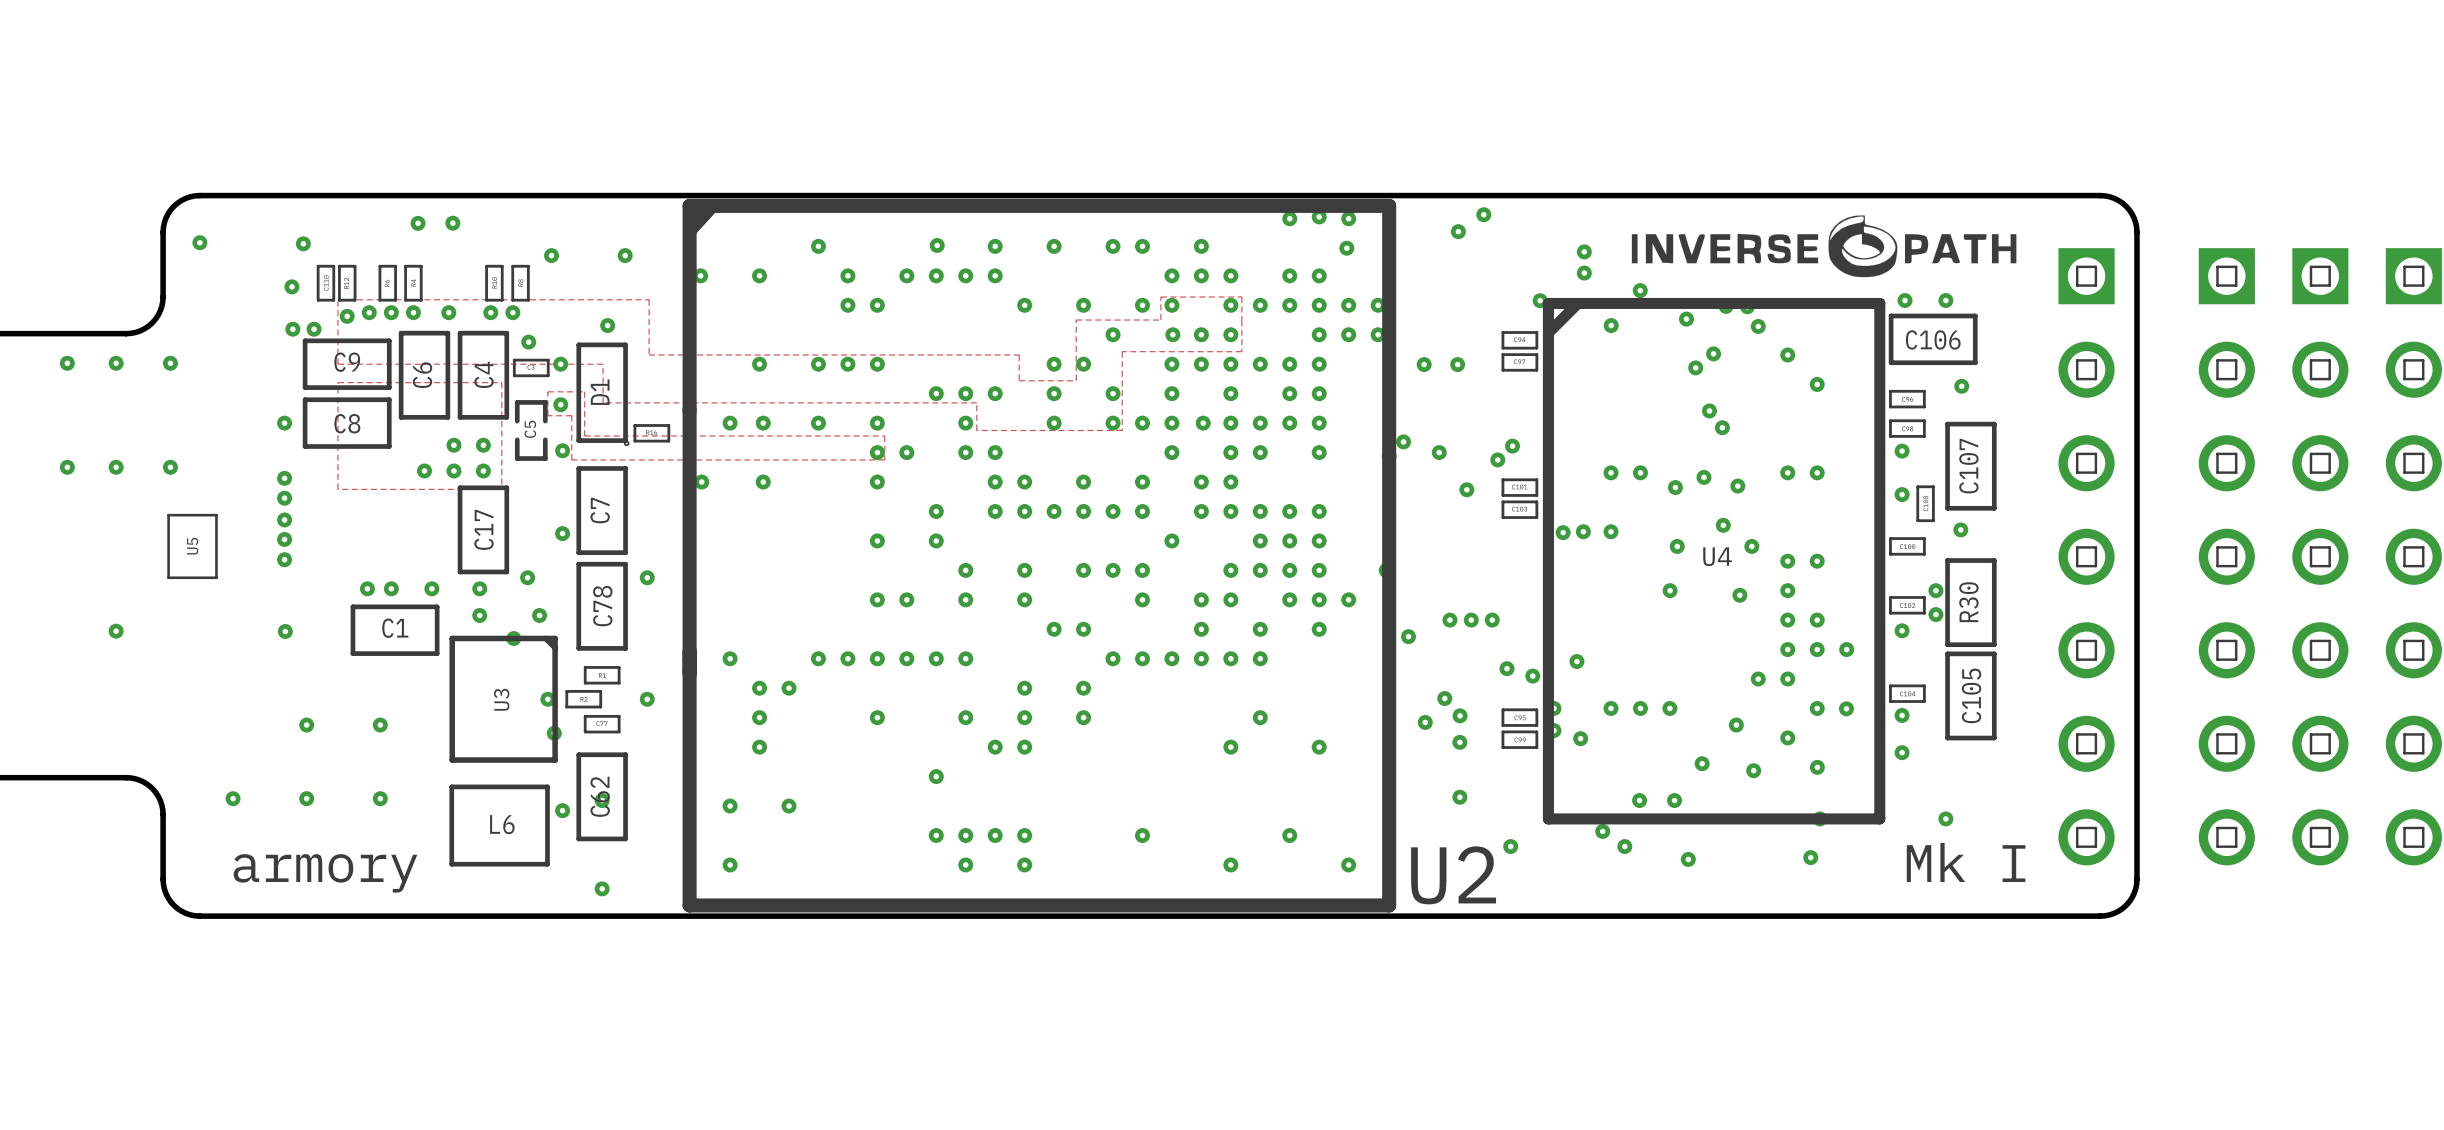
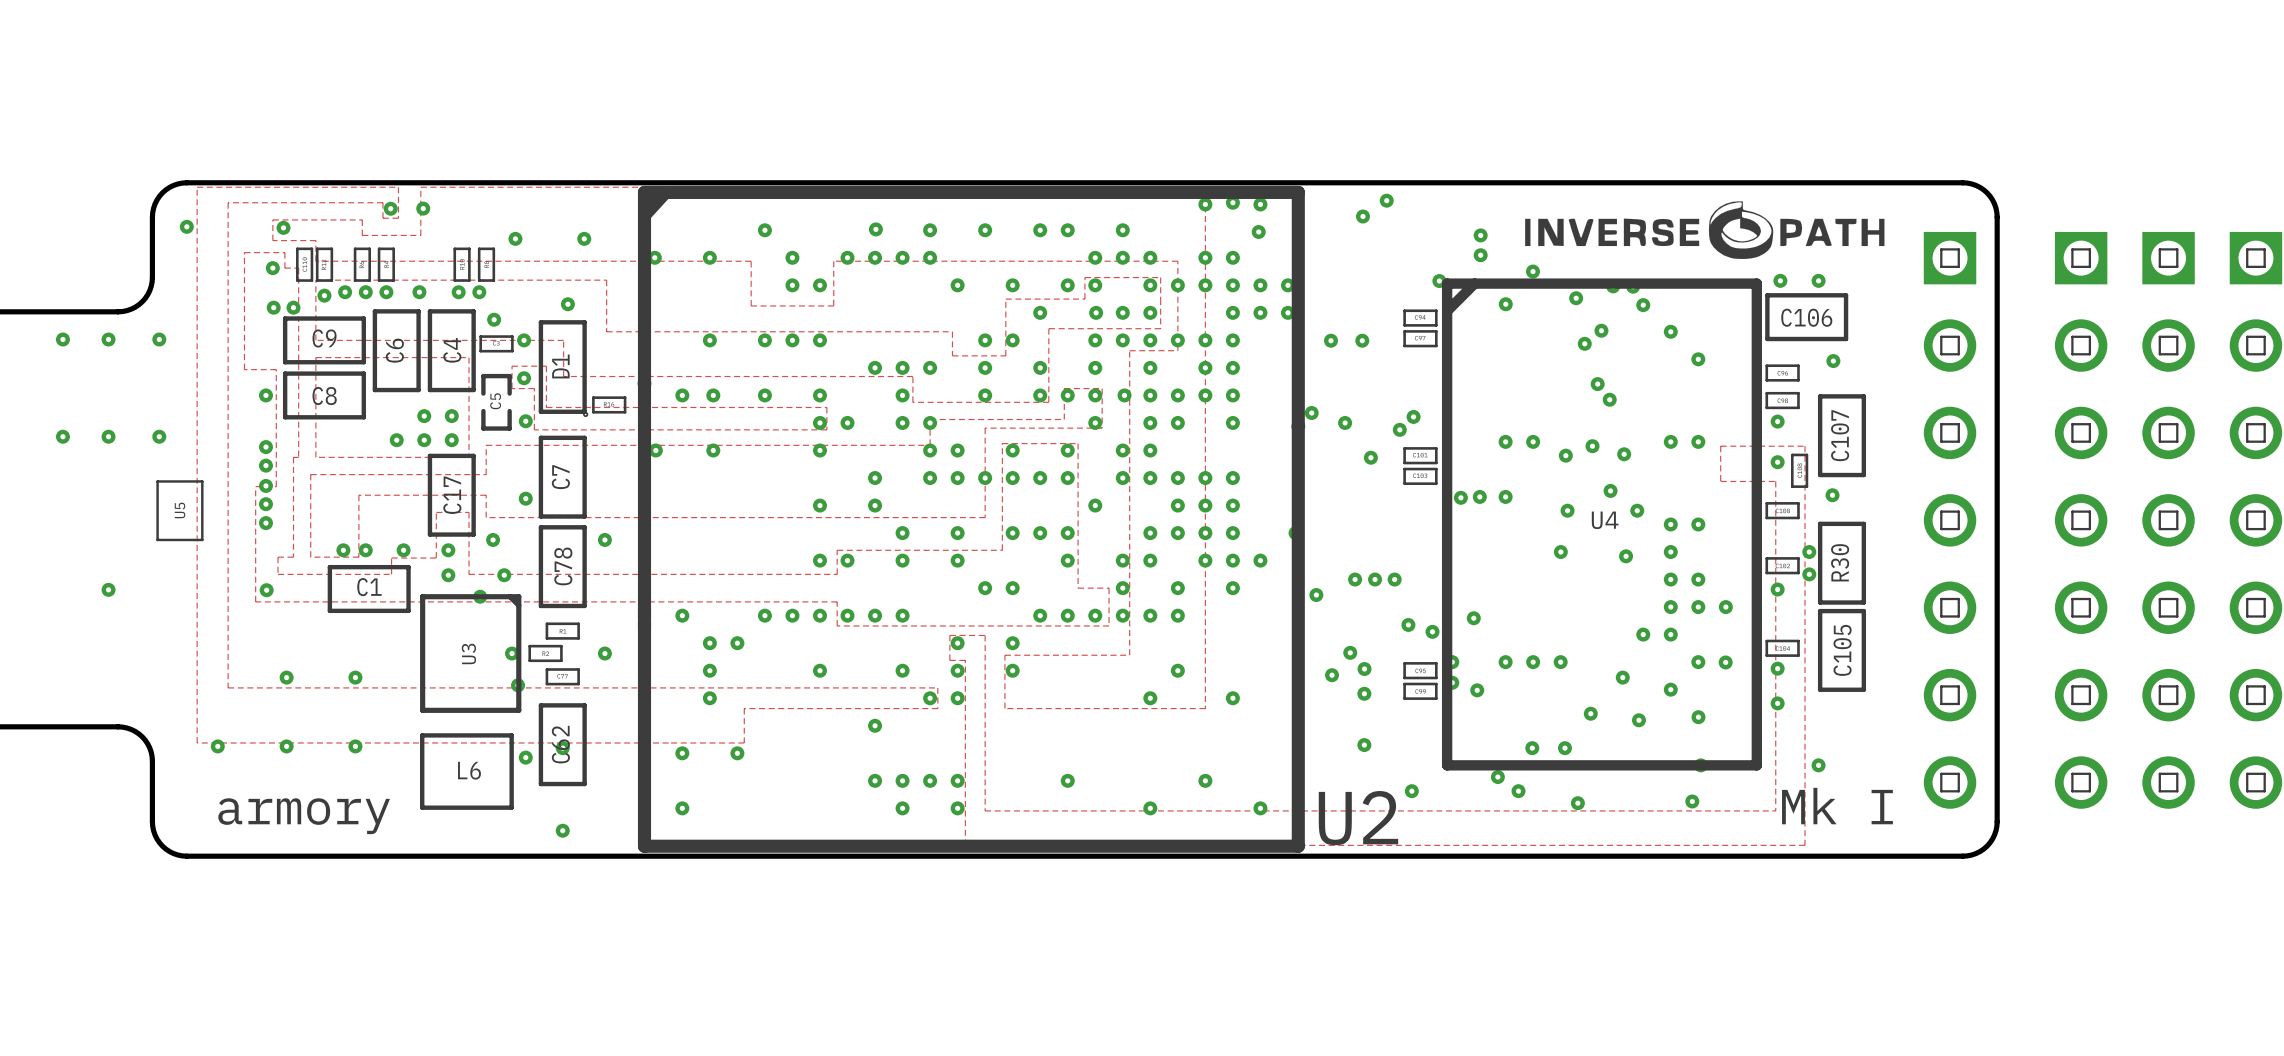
zone outline: none -> (197, 187) (197, 742) (744, 742) (744, 708) (937, 708) (937, 687) (228, 687) (228, 202) (382, 202) (382, 218) (398, 218) (398, 187) (197, 187)
zone outline: none -> (420, 187) (1205, 187) (1205, 708) (1004, 708) (1004, 655) (1129, 655) (1129, 350) (1177, 350) (1177, 261) (833, 261) (833, 305) (751, 305) (751, 261) (315, 261) (315, 240) (272, 240) (272, 219) (362, 219) (362, 235) (420, 235) (420, 187)
zone outline: none -> (244, 252) (244, 369) (276, 369) (276, 486) (255, 486) (255, 601) (837, 601) (837, 625) (1109, 625) (1109, 588) (1078, 588) (1078, 443) (1002, 443) (1002, 550) (837, 550) (837, 574) (469, 574) (469, 512) (436, 512) (436, 558) (391, 558) (391, 574) (278, 574) (278, 557) (293, 557) (293, 457) (298, 457) (298, 268) (284, 268) (284, 252) (244, 252)
zone outline: none -> (1064, 388) (1064, 419) (930, 419) (930, 445) (486, 445) (486, 474) (310, 474) (310, 557) (358, 557) (358, 495) (486, 495) (486, 517) (985, 517) (985, 428) (1102, 428) (1102, 388) (1064, 388)
zone outline: none -> (1720, 446) (1720, 481) (1775, 481) (1775, 810) (985, 810) (985, 635) (949, 635) (949, 660) (965, 660) (965, 845) (1804, 845) (1804, 446) (1720, 446)

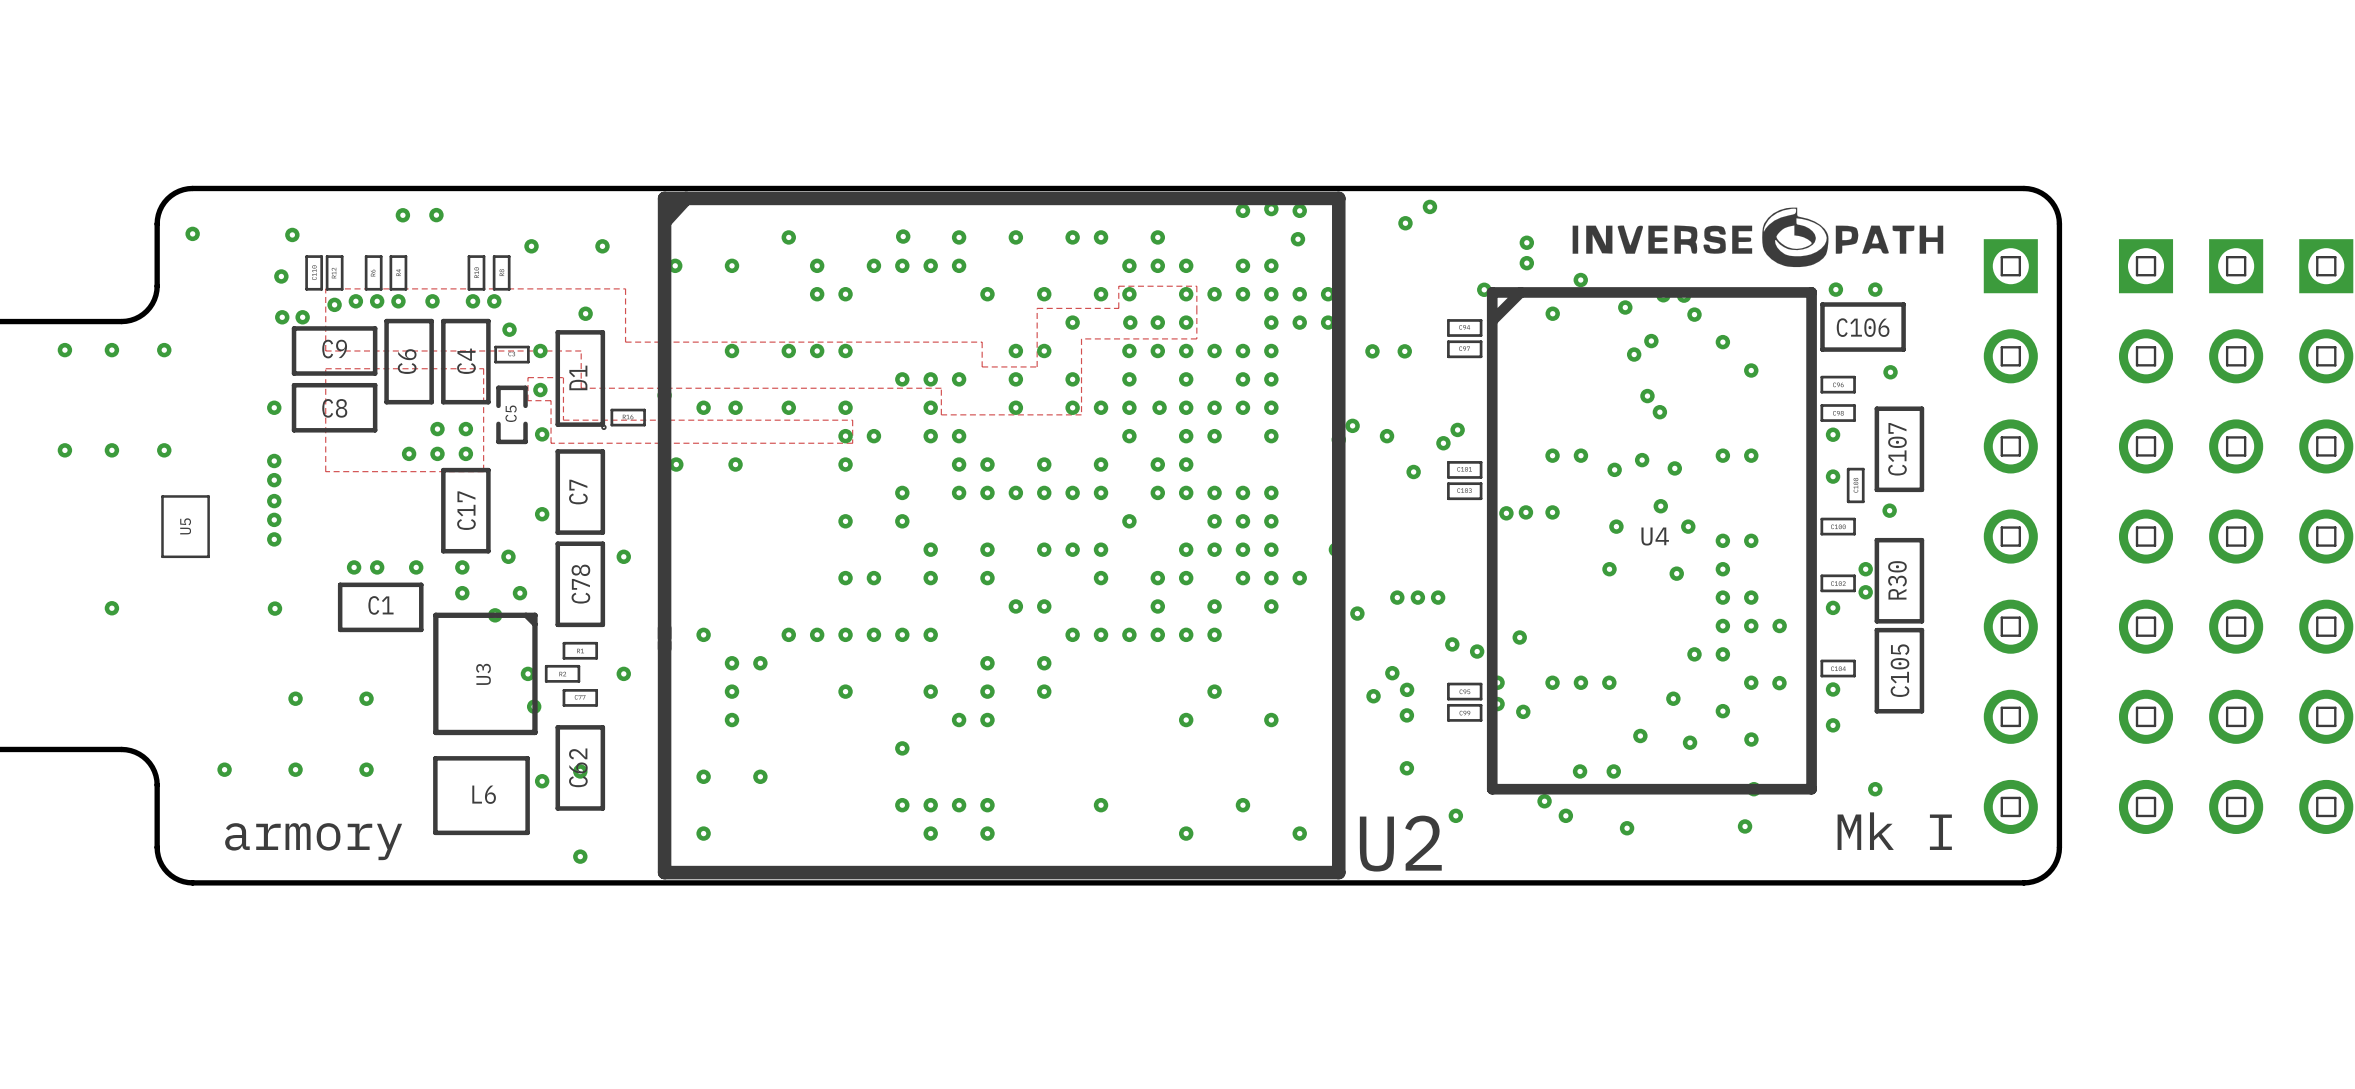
zone outline: (197, 187) (197, 742) (744, 742) (744, 708) (937, 708) (937, 687) (228, 687) (228, 202) (382, 202) (382, 218) (398, 218) (398, 187) (197, 187) -> none
zone outline: (420, 187) (1205, 187) (1205, 708) (1004, 708) (1004, 655) (1129, 655) (1129, 350) (1177, 350) (1177, 261) (833, 261) (833, 305) (751, 305) (751, 261) (315, 261) (315, 240) (272, 240) (272, 219) (362, 219) (362, 235) (420, 235) (420, 187) -> none
zone outline: (244, 252) (244, 369) (276, 369) (276, 486) (255, 486) (255, 601) (837, 601) (837, 625) (1109, 625) (1109, 588) (1078, 588) (1078, 443) (1002, 443) (1002, 550) (837, 550) (837, 574) (469, 574) (469, 512) (436, 512) (436, 558) (391, 558) (391, 574) (278, 574) (278, 557) (293, 557) (293, 457) (298, 457) (298, 268) (284, 268) (284, 252) (244, 252) -> none
zone outline: (1064, 388) (1064, 419) (930, 419) (930, 445) (486, 445) (486, 474) (310, 474) (310, 557) (358, 557) (358, 495) (486, 495) (486, 517) (985, 517) (985, 428) (1102, 428) (1102, 388) (1064, 388) -> none
zone outline: (1720, 446) (1720, 481) (1775, 481) (1775, 810) (985, 810) (985, 635) (949, 635) (949, 660) (965, 660) (965, 845) (1804, 845) (1804, 446) (1720, 446) -> none

